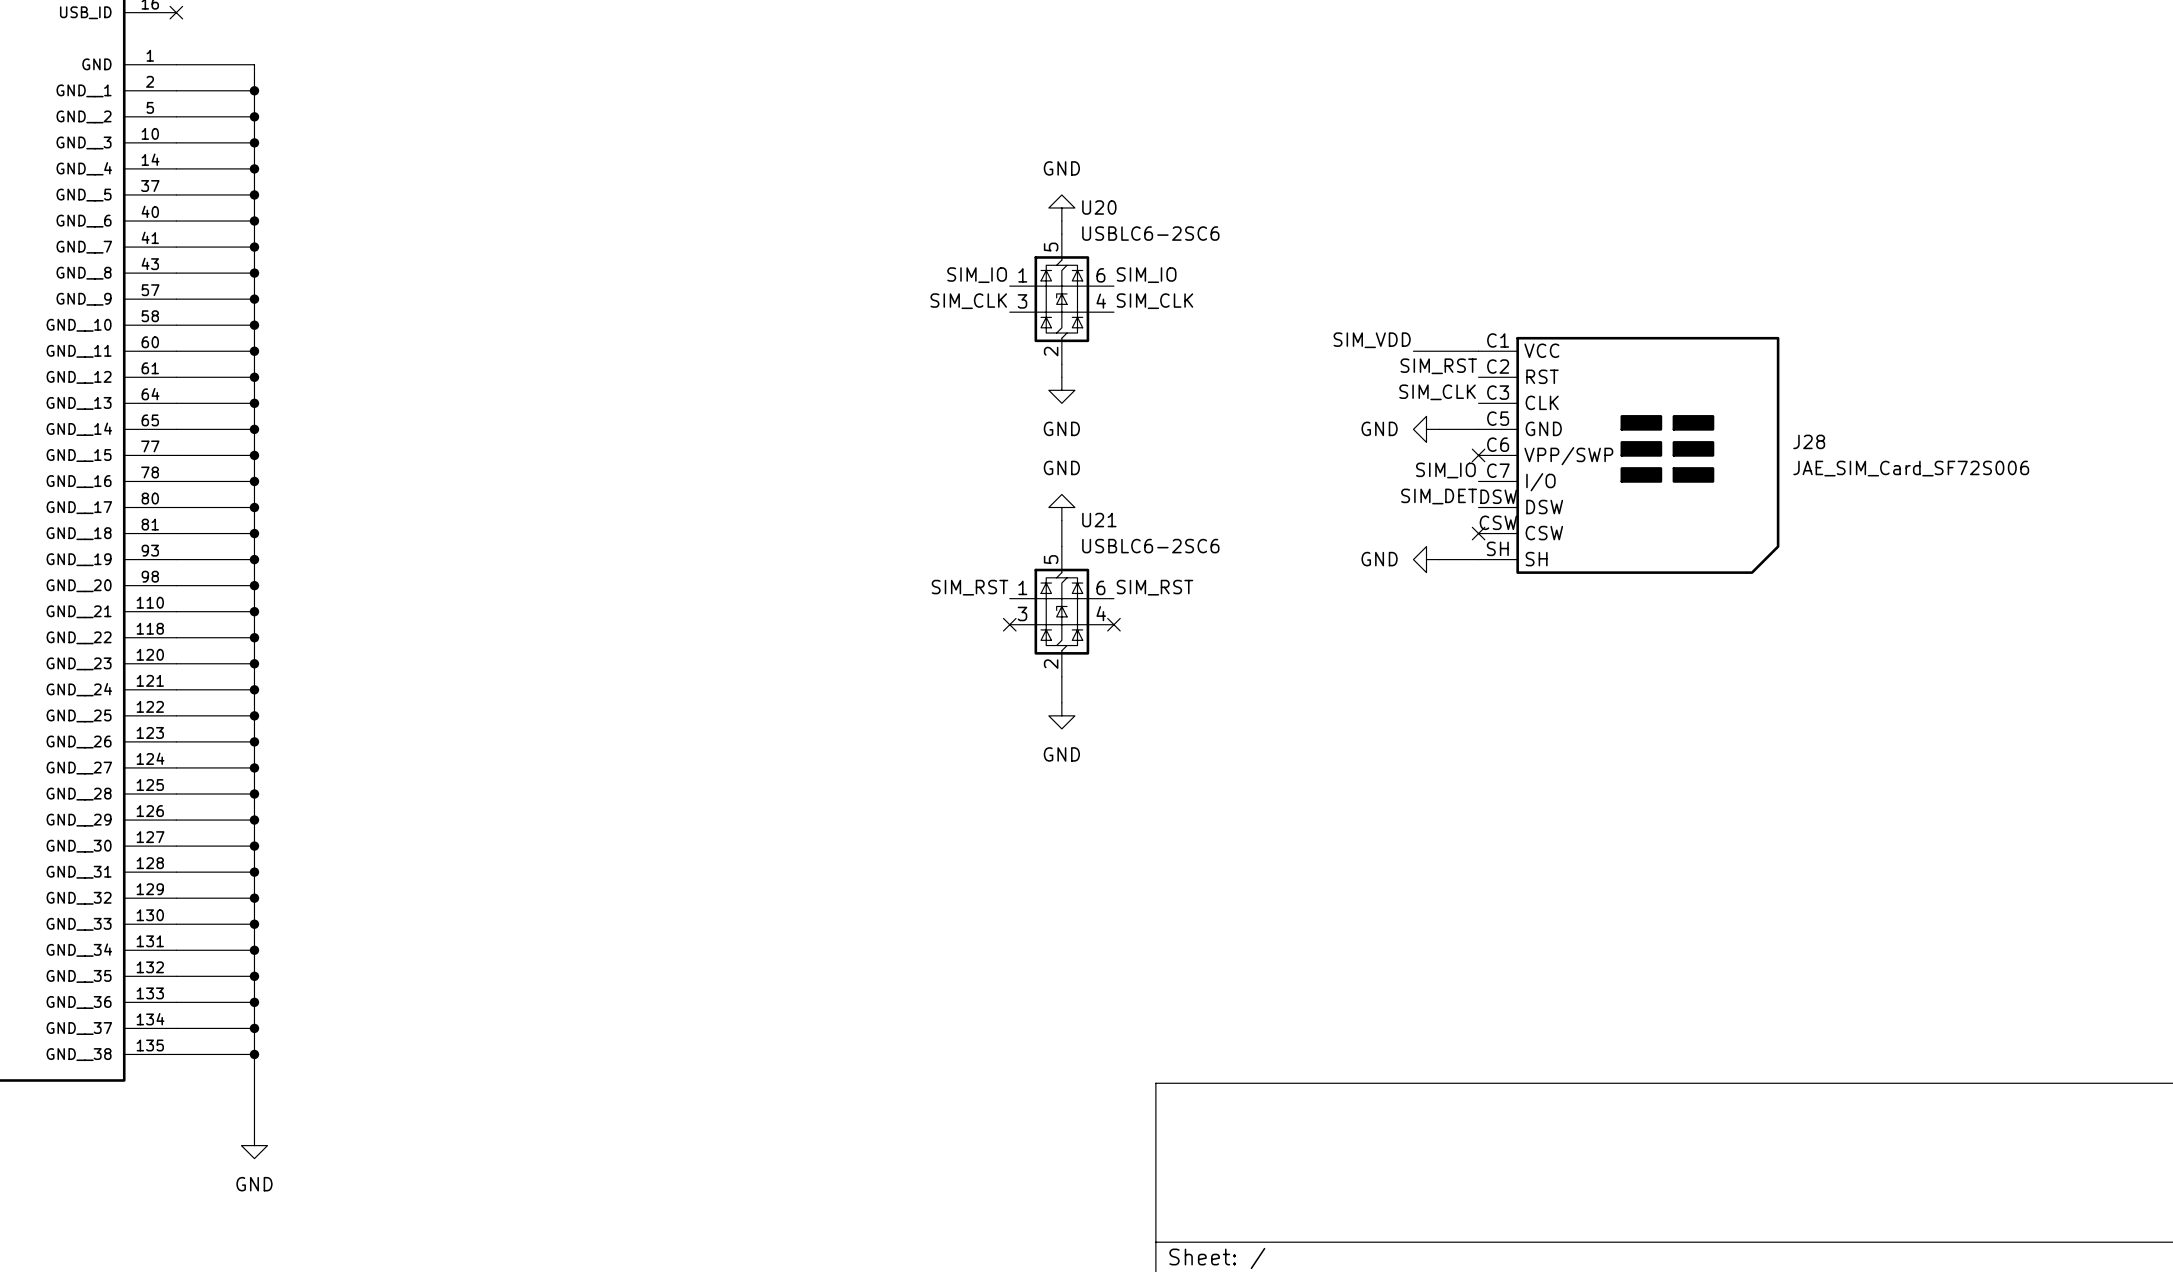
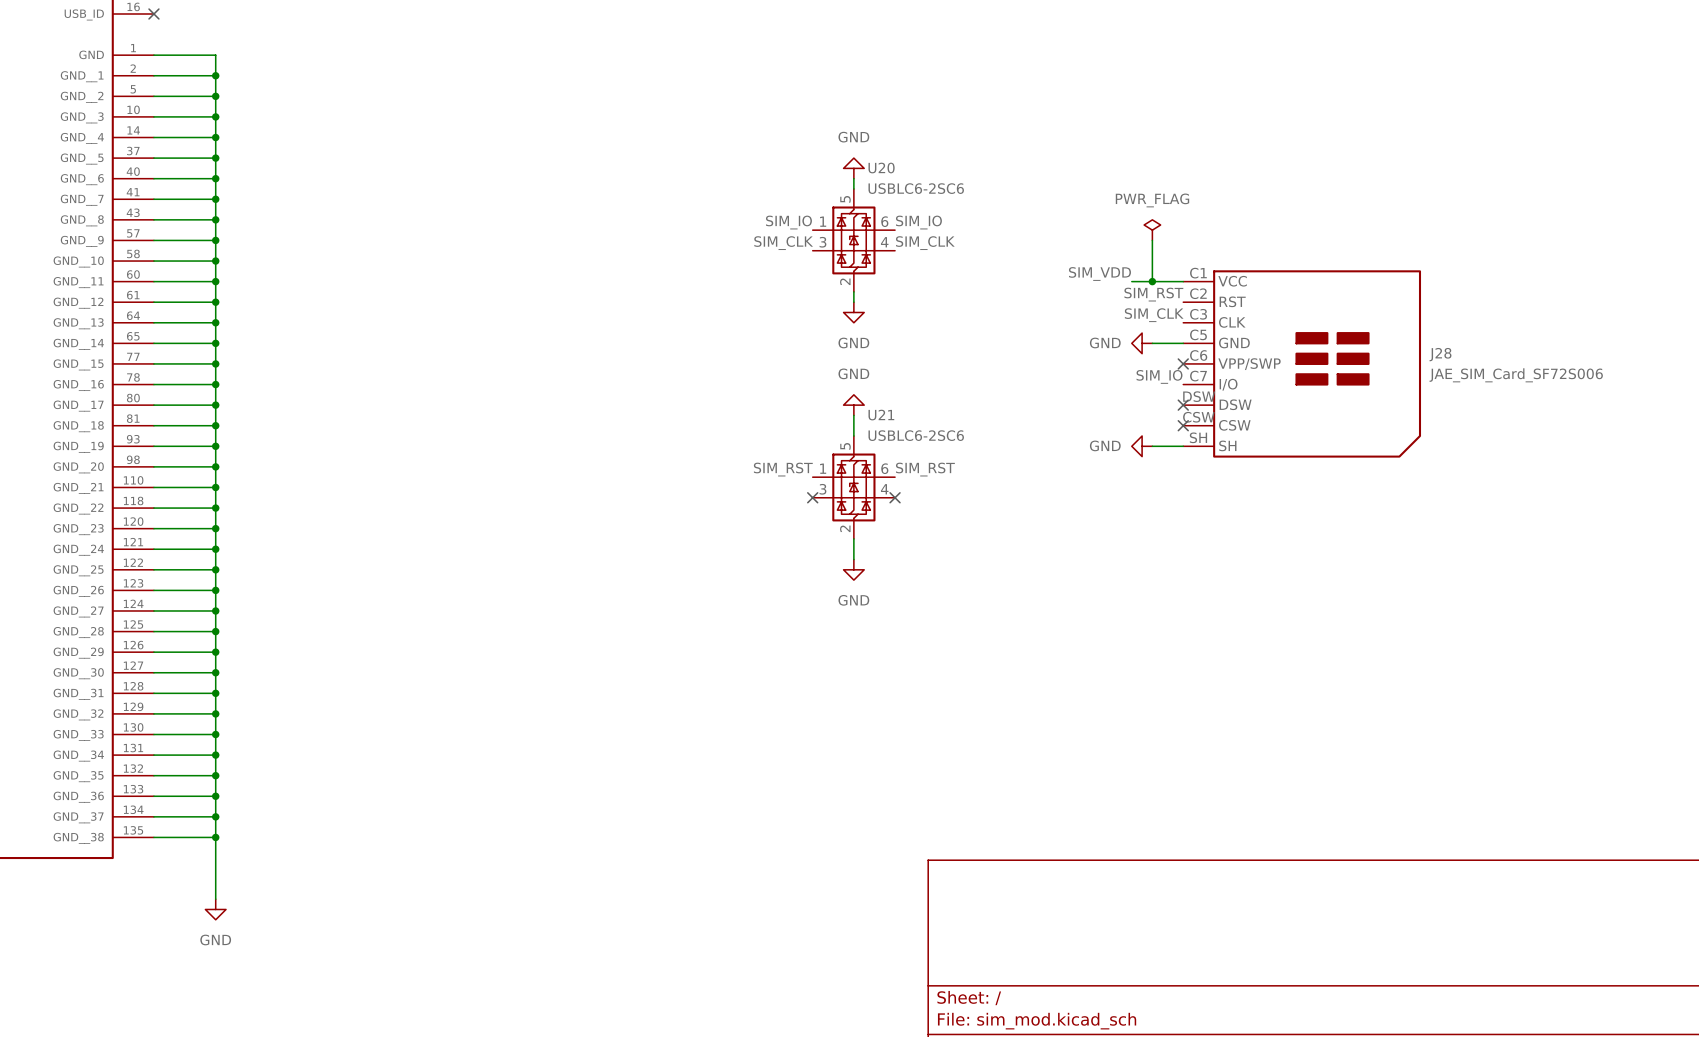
power symbol: none -> PWR_FLAG (1152, 230)
wire: none -> (1152, 240) (1152, 281)
junction: none -> (1152, 281)
label: SIM_DET (1439, 496) -> none
no-connect mark: none -> (1183, 405)

